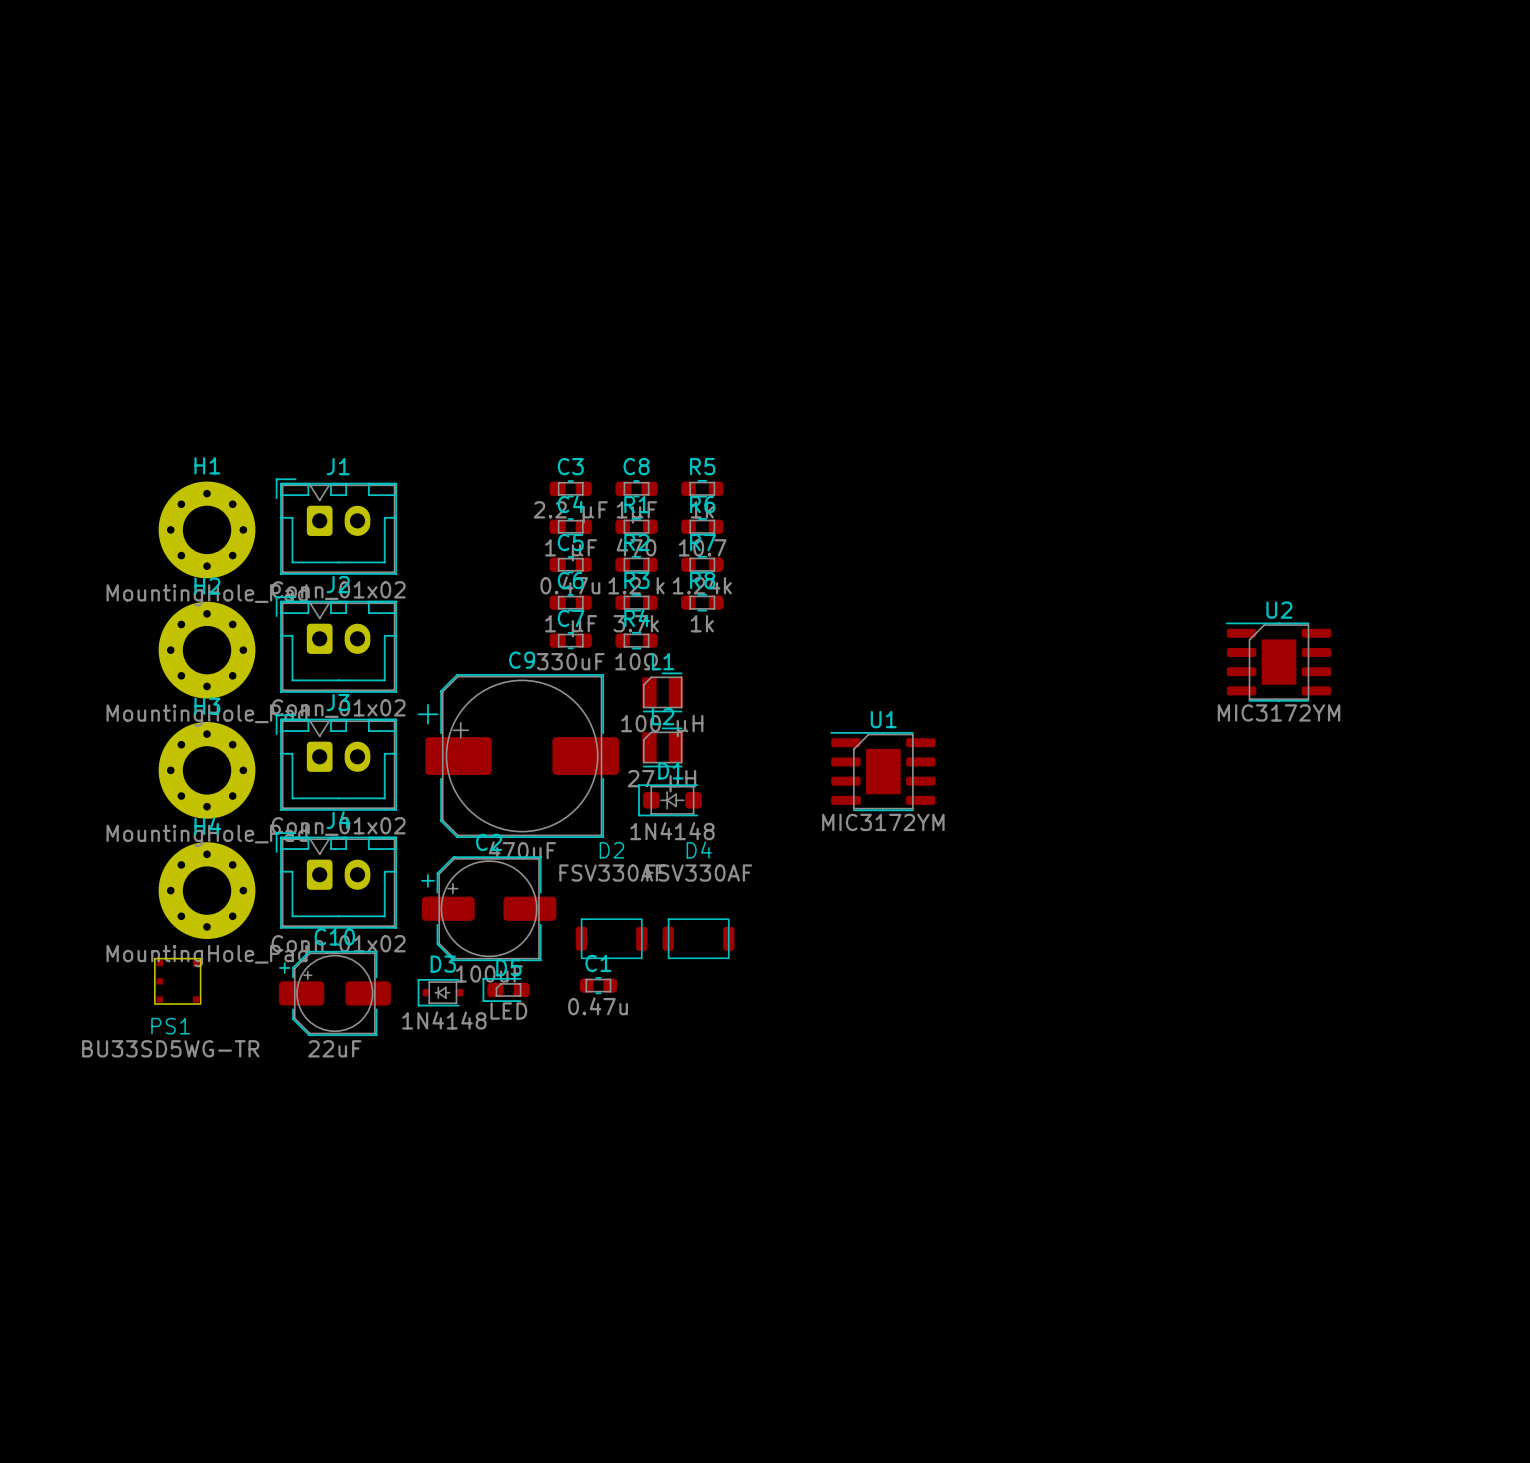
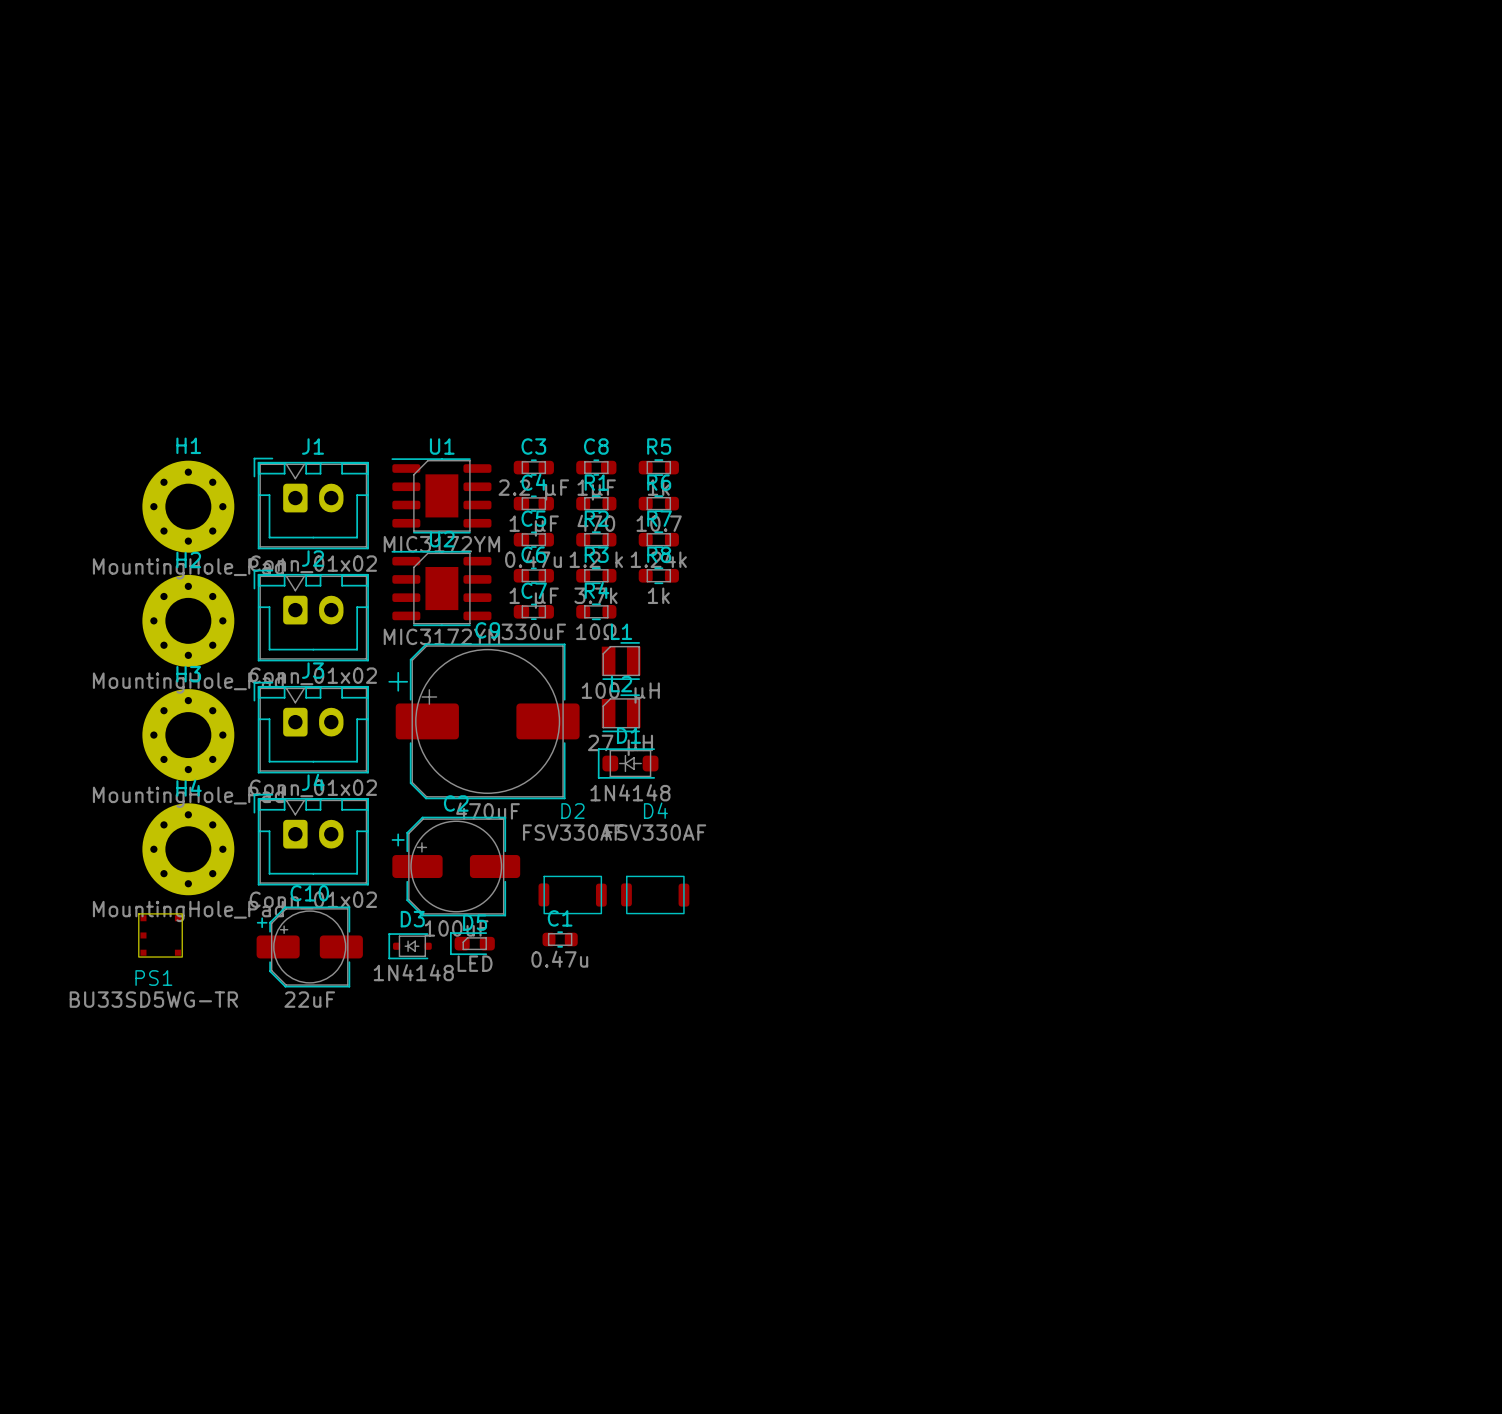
U2 position: (1278, 662) -> (441, 588)
U1 position: (882, 771) -> (441, 495)

